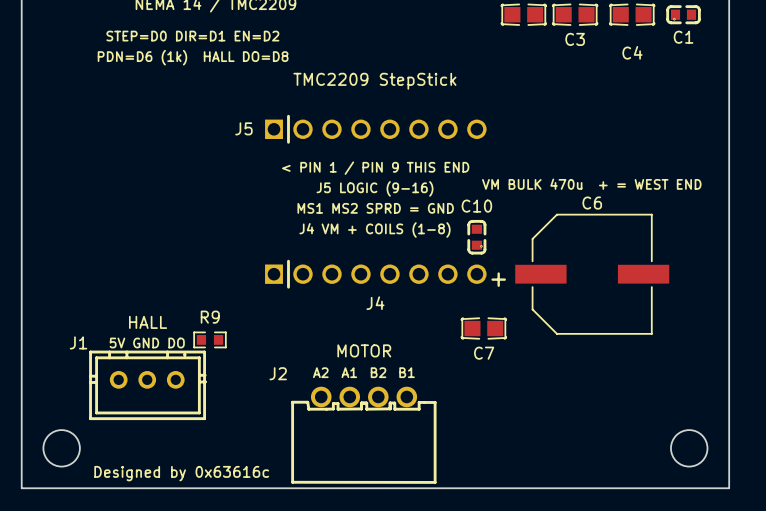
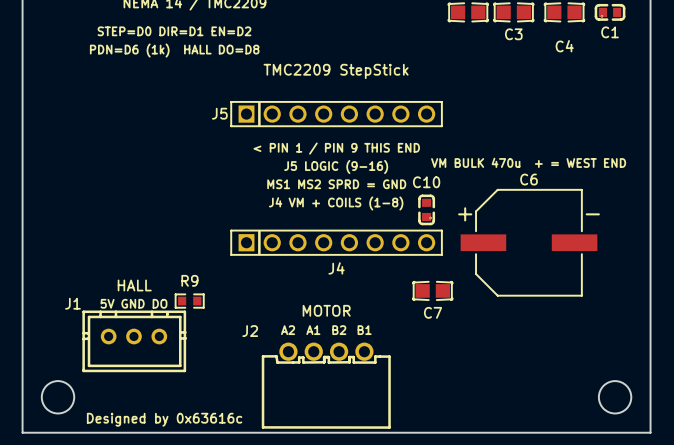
J5 footprint: [265, 114, 487, 144] -> [230, 101, 443, 128]
C6 footprint: [515, 213, 670, 335] -> [458, 189, 600, 297]
J4 footprint: [265, 259, 487, 289] -> [230, 229, 443, 256]
text: + (498, 279) -> none

